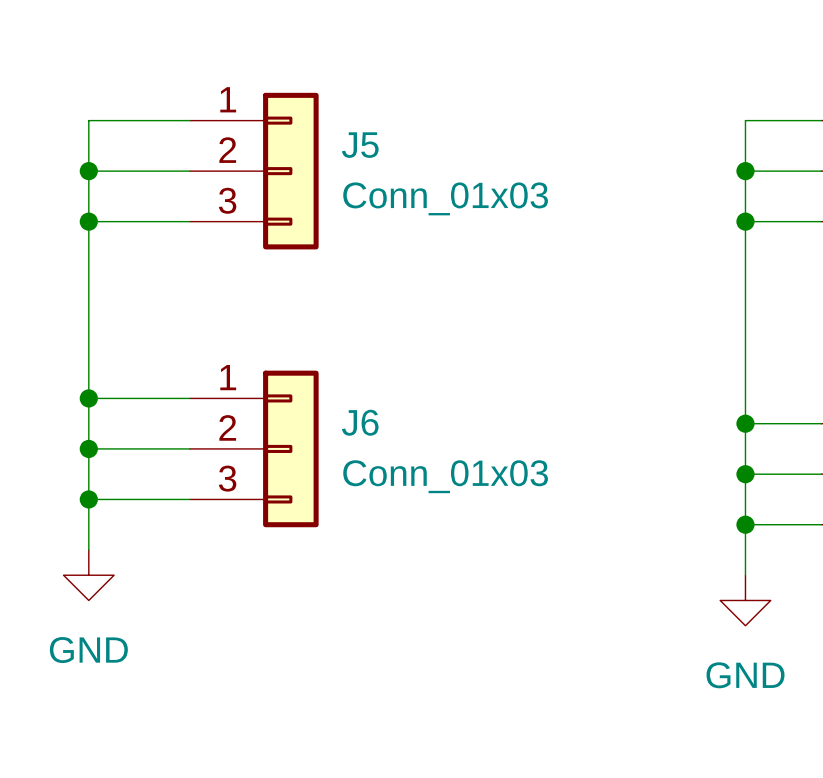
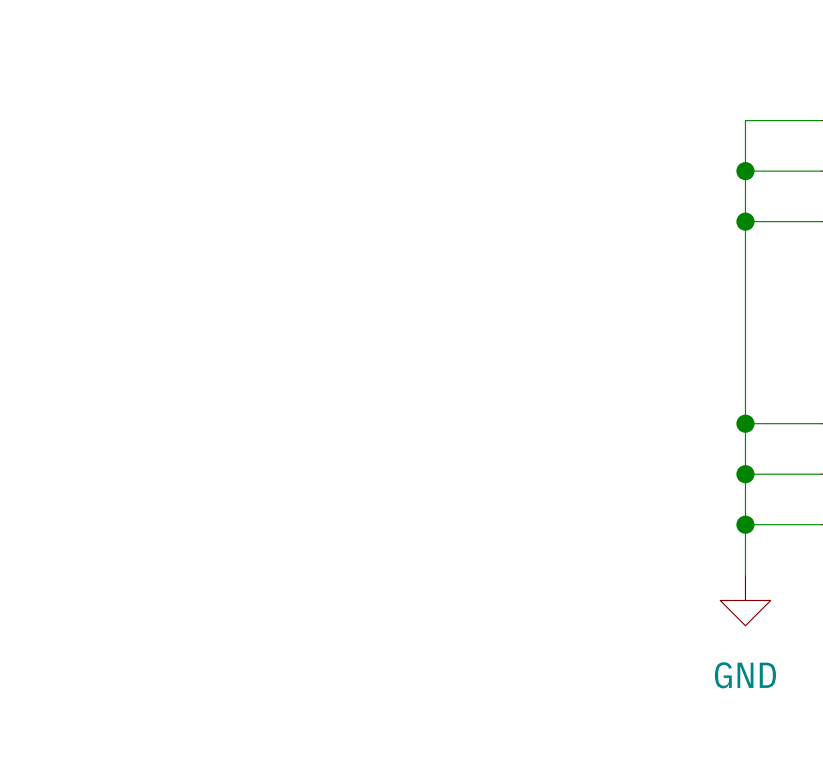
wire: (189, 120) (88, 120) (88, 549) -> none
wire: (88, 171) (189, 171) -> none
junction: (88, 171) -> none
J5: Conn_01x03 (254, 171) -> none
wire: (88, 221) (189, 221) -> none
junction: (88, 221) -> none
wire: (88, 398) (189, 398) -> none
junction: (88, 398) -> none
wire: (88, 448) (189, 448) -> none
junction: (88, 448) -> none
J6: Conn_01x03 (254, 448) -> none
wire: (88, 499) (189, 499) -> none
junction: (88, 499) -> none
power symbol: GND (88, 575) -> none

